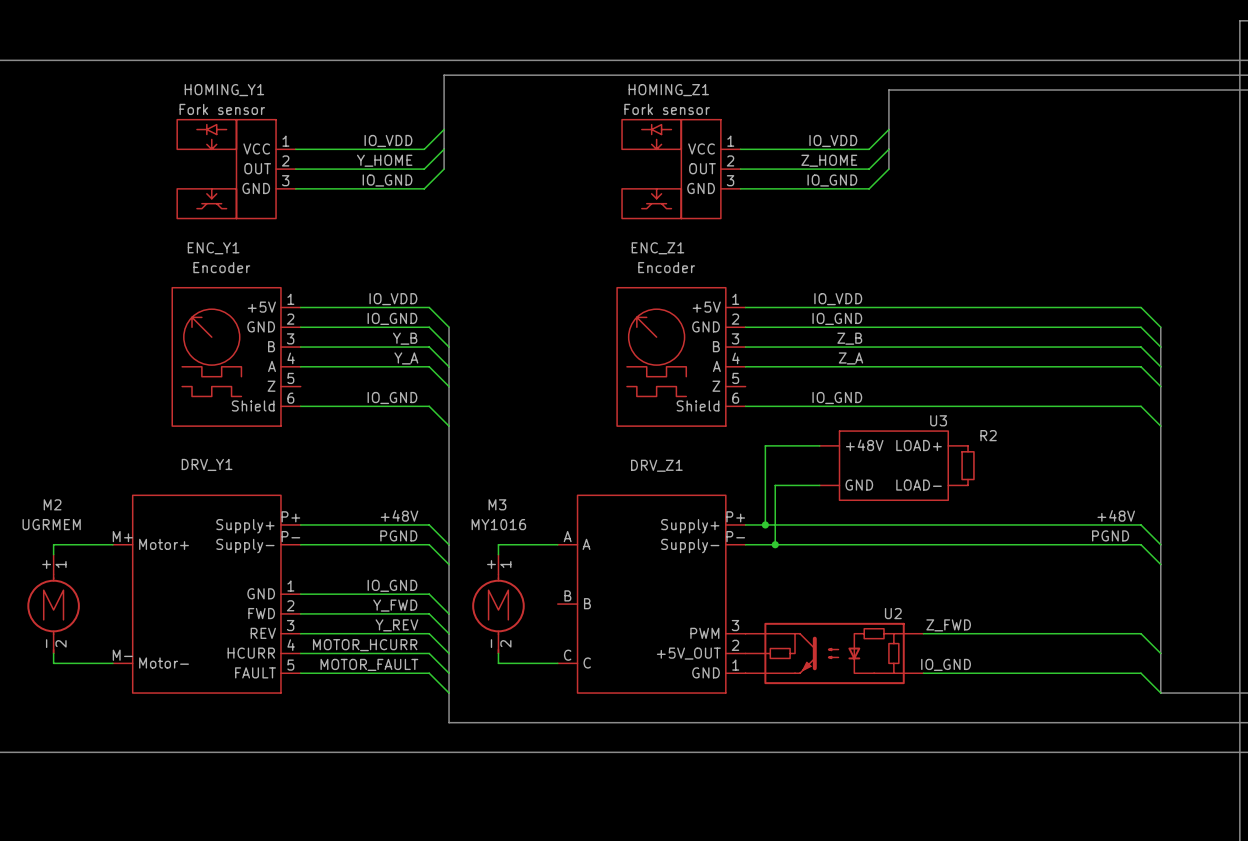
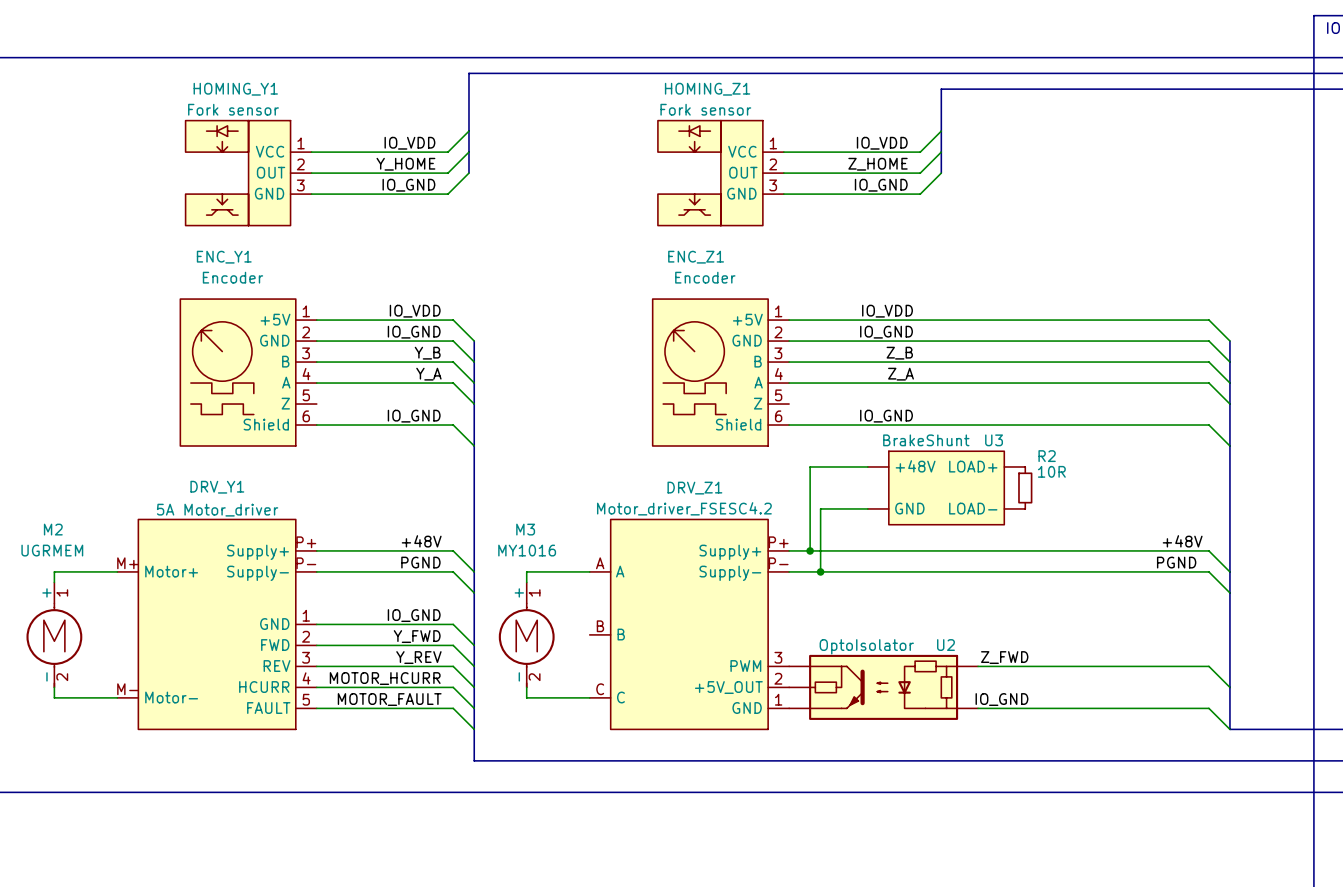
U3 value: none -> BrakeShunt (926, 440)
R2 value: none -> 10R (1051, 471)
DRV_Z1 value: none -> Motor_driver_FSESC4.2 (684, 508)
DRV_Y1 value: none -> 5A Motor_driver (217, 510)
U2 value: none -> OptoIsolator (866, 646)

